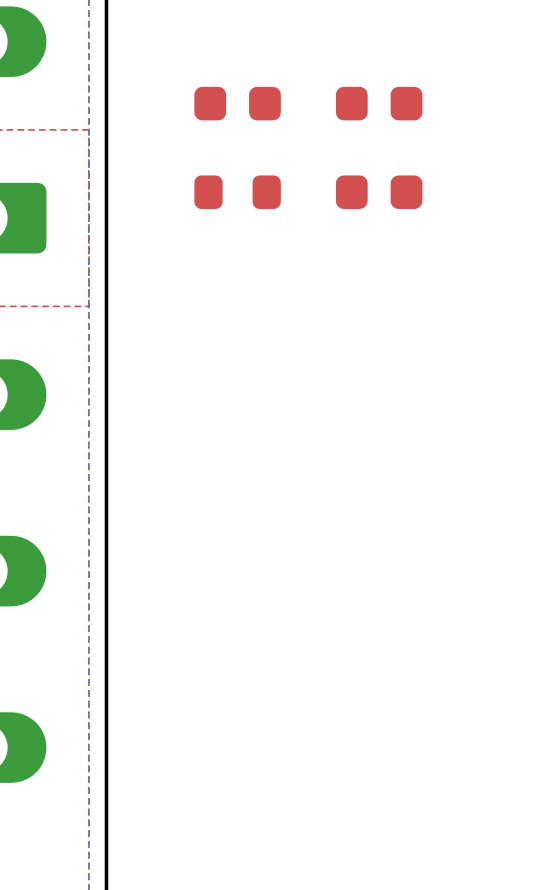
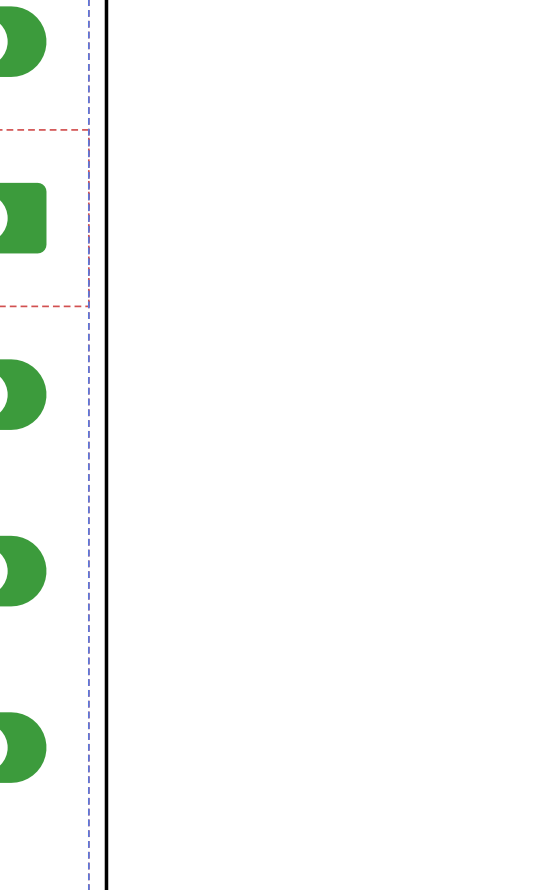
part: (237, 103) -> none
part: (379, 103) -> none
part: (237, 192) -> none
part: (379, 192) -> none

